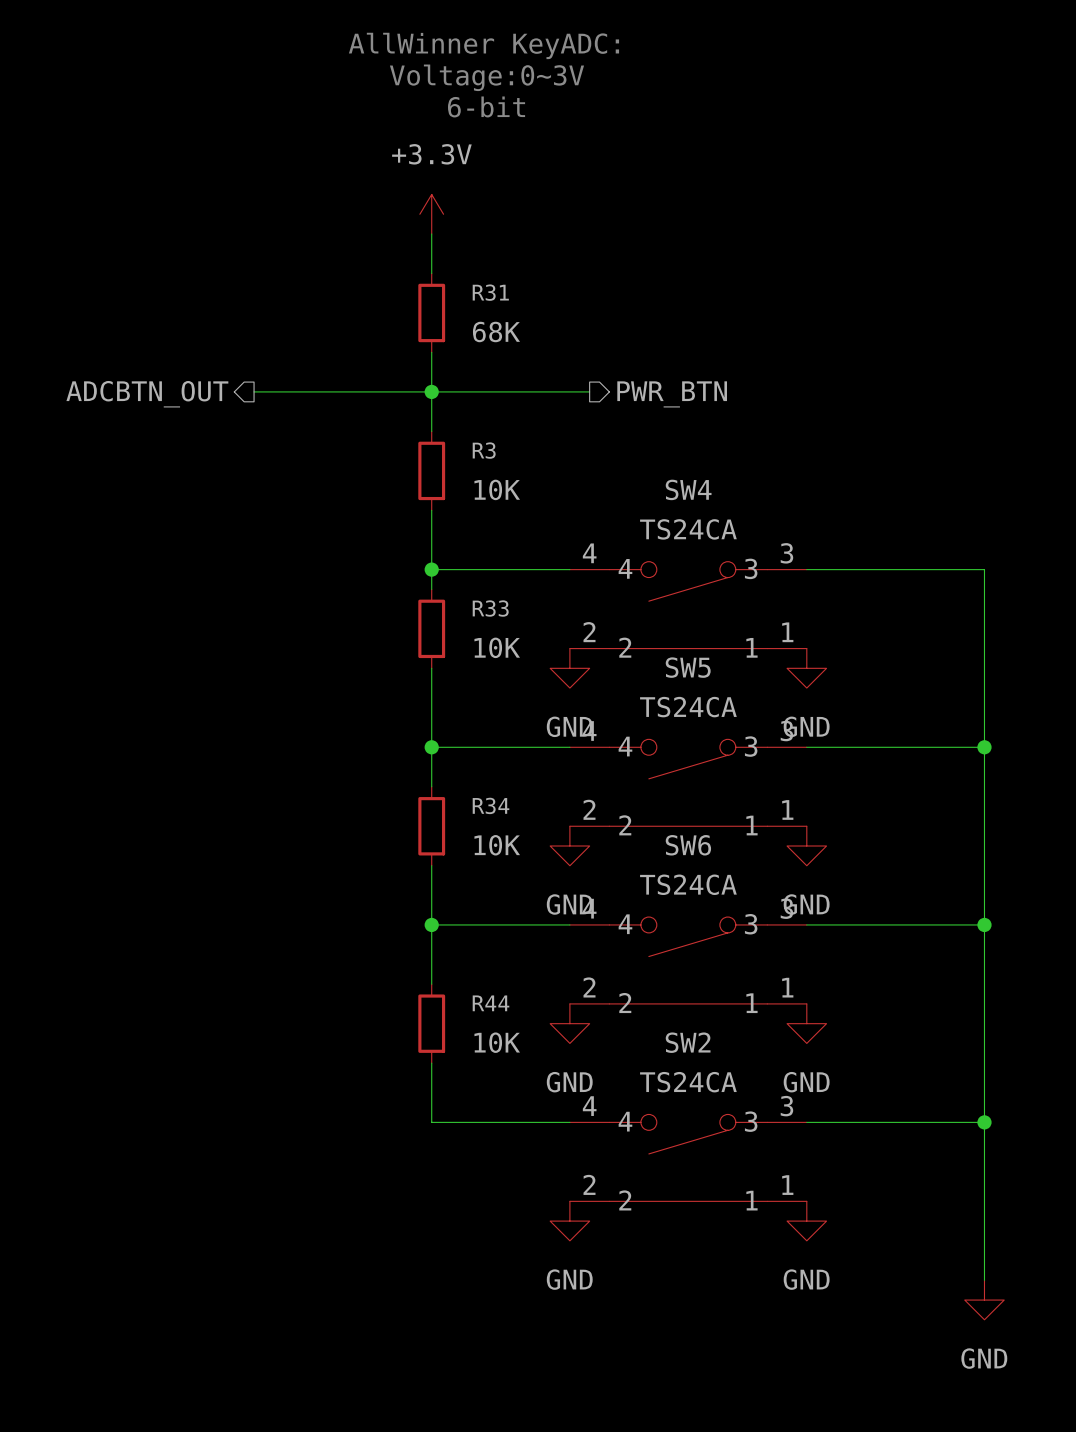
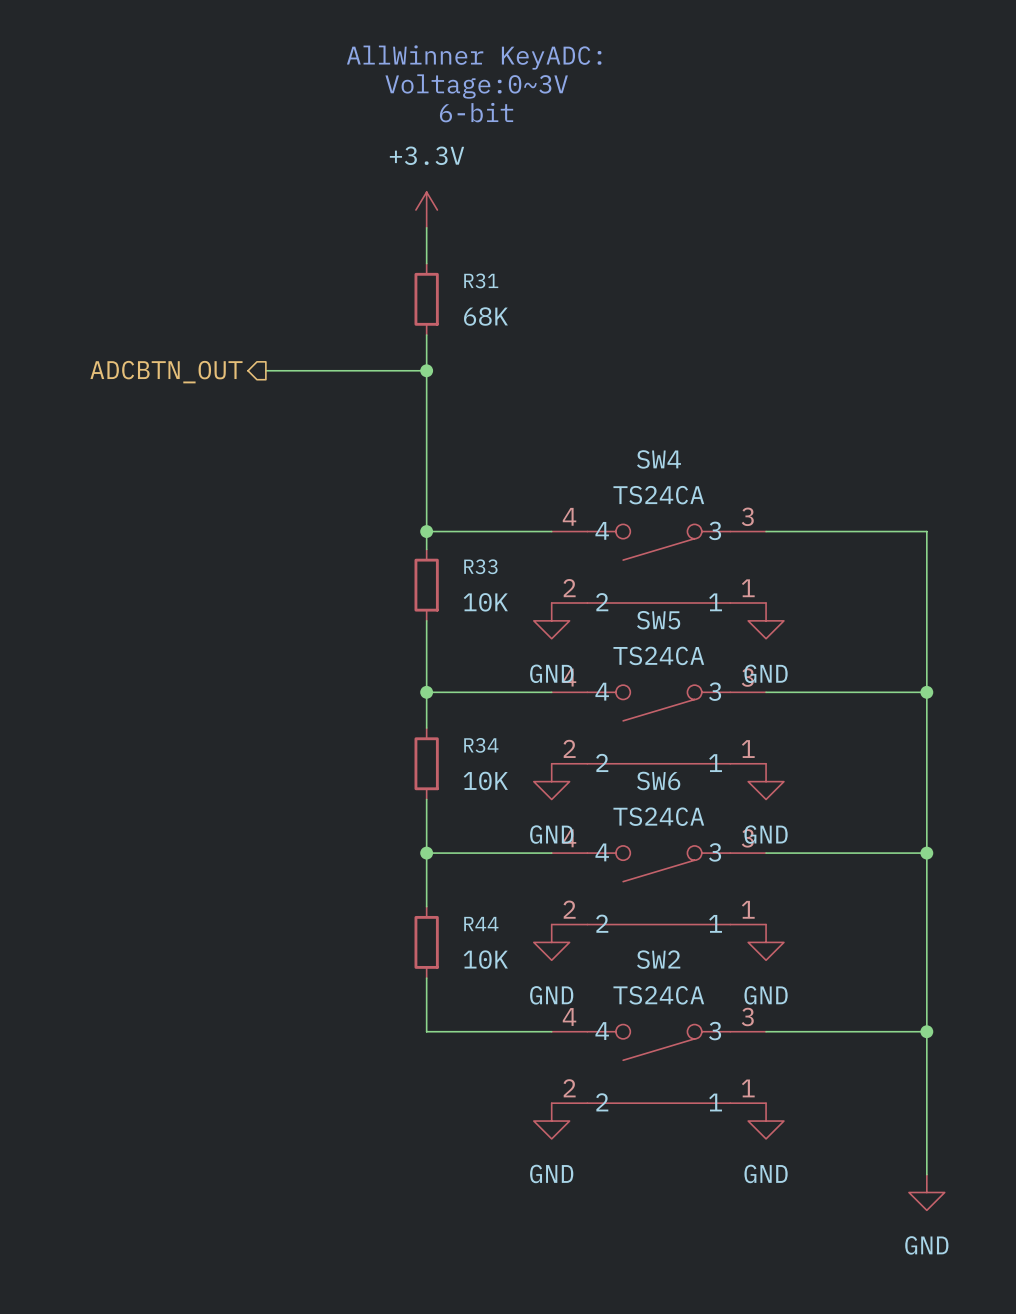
wire: (431, 391) (589, 391) -> none
hierarchical label: PWR_BTN (672, 394) -> none
wire: none -> (426, 406) (426, 477)
R3: 10K (431, 470) -> none

